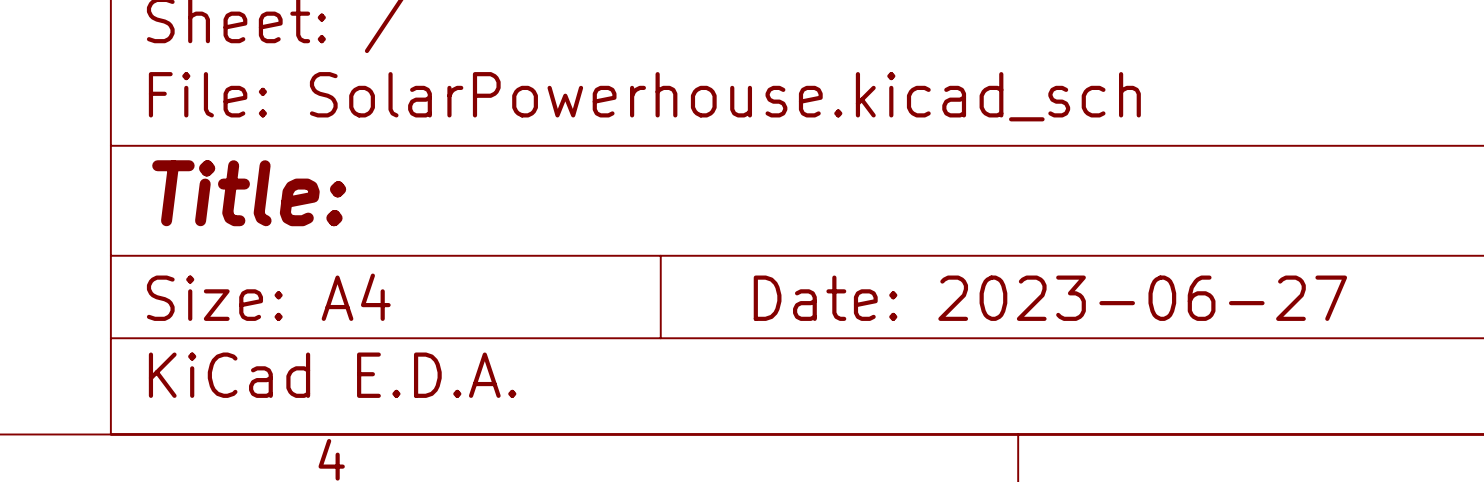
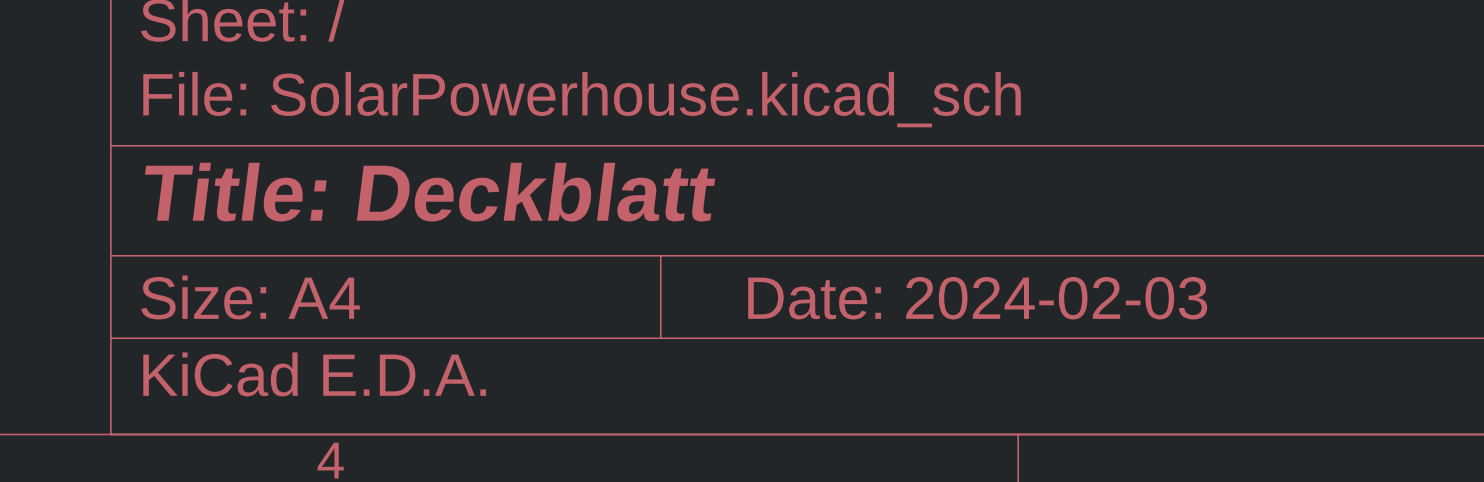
title block: Title: (249, 193) -> Title: Deckblatt (430, 192)
title block: Date: 2023-06-27 (1050, 298) -> Date: 2024-02-03 (977, 298)

